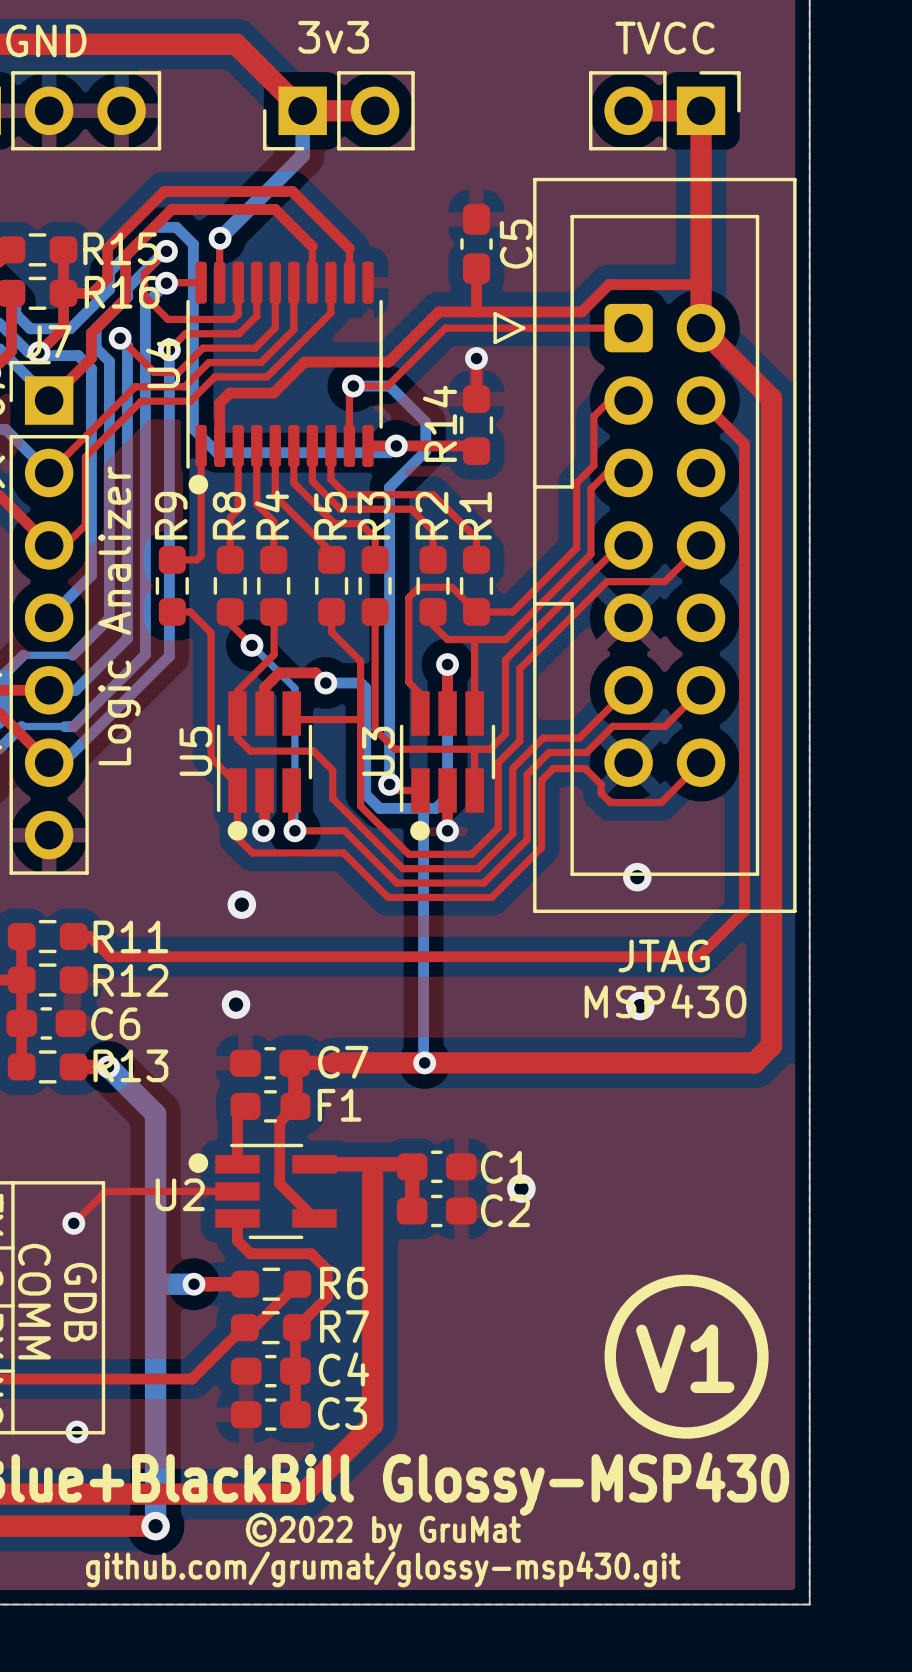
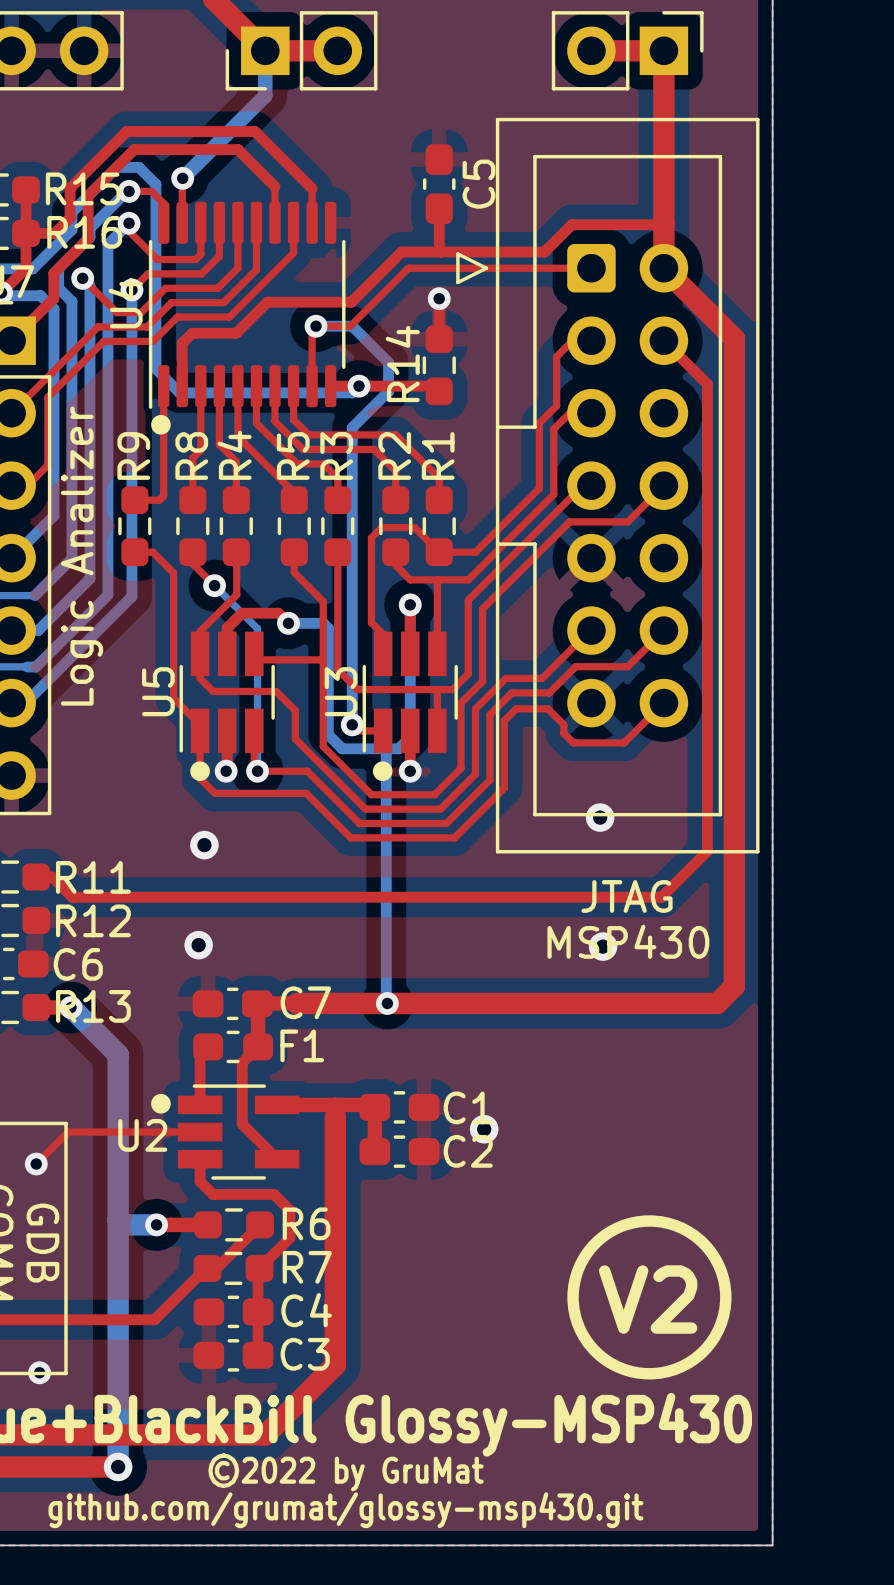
top track: (166, 251) (144, 273) (144, 295) (167, 319) (194, 319) -> (129, 223) (129, 231) (157, 259)
top track: (201, 282) (166, 283) -> (163, 222) (163, 203) (151, 191) (129, 191)
text: V1 (685, 1358) -> V2 (648, 1299)

